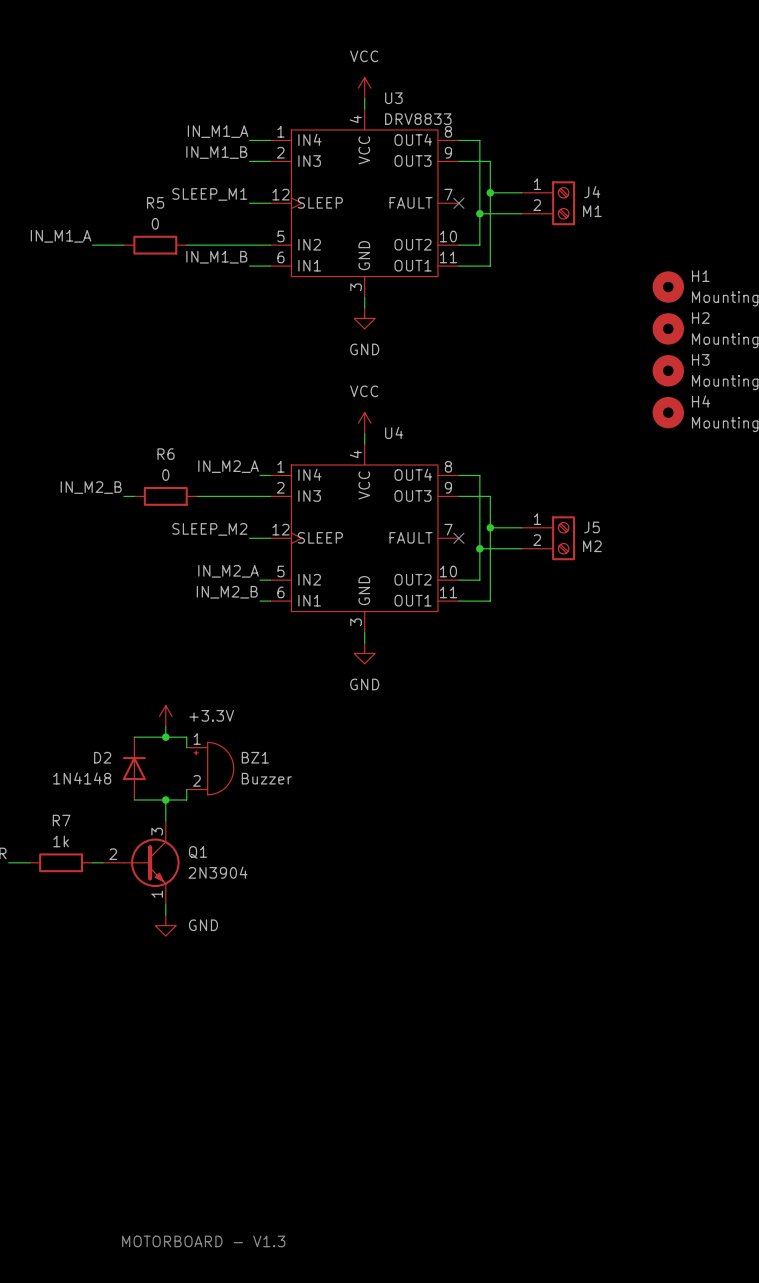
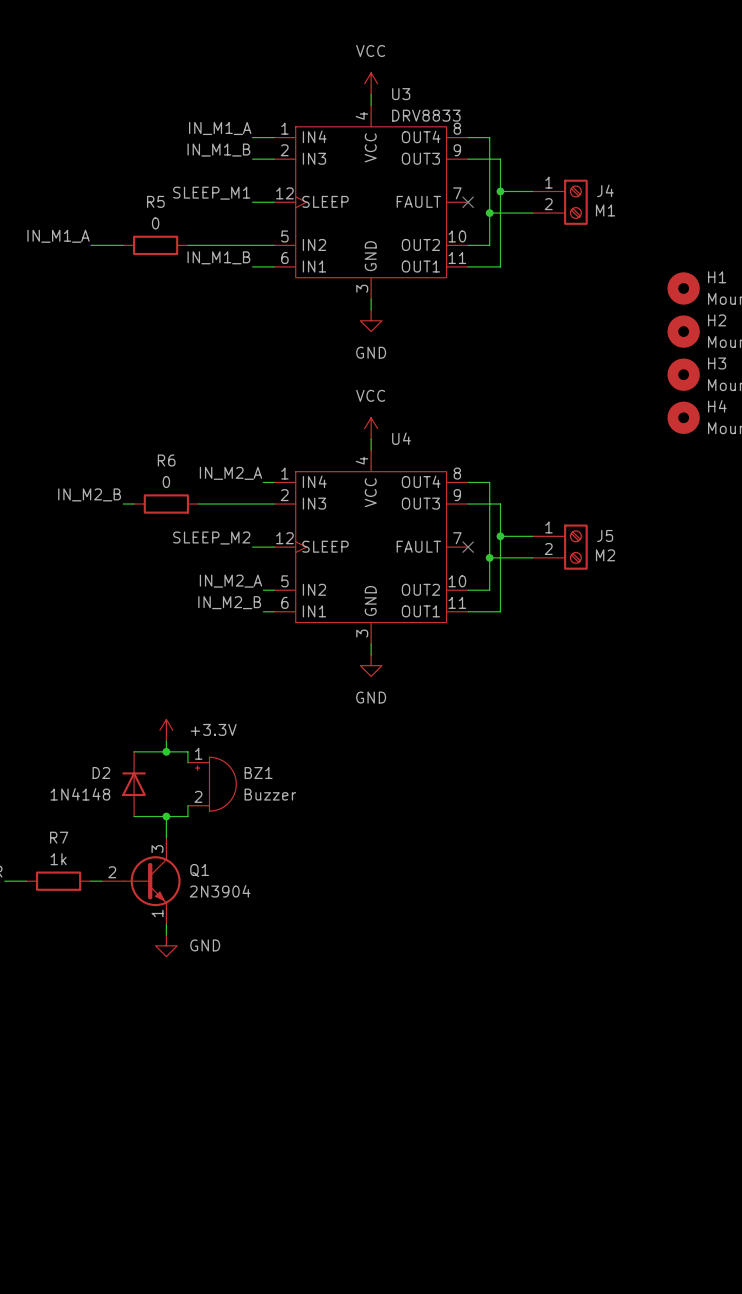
text: MOTORBOARD - V1.3 (203, 1241) -> none

